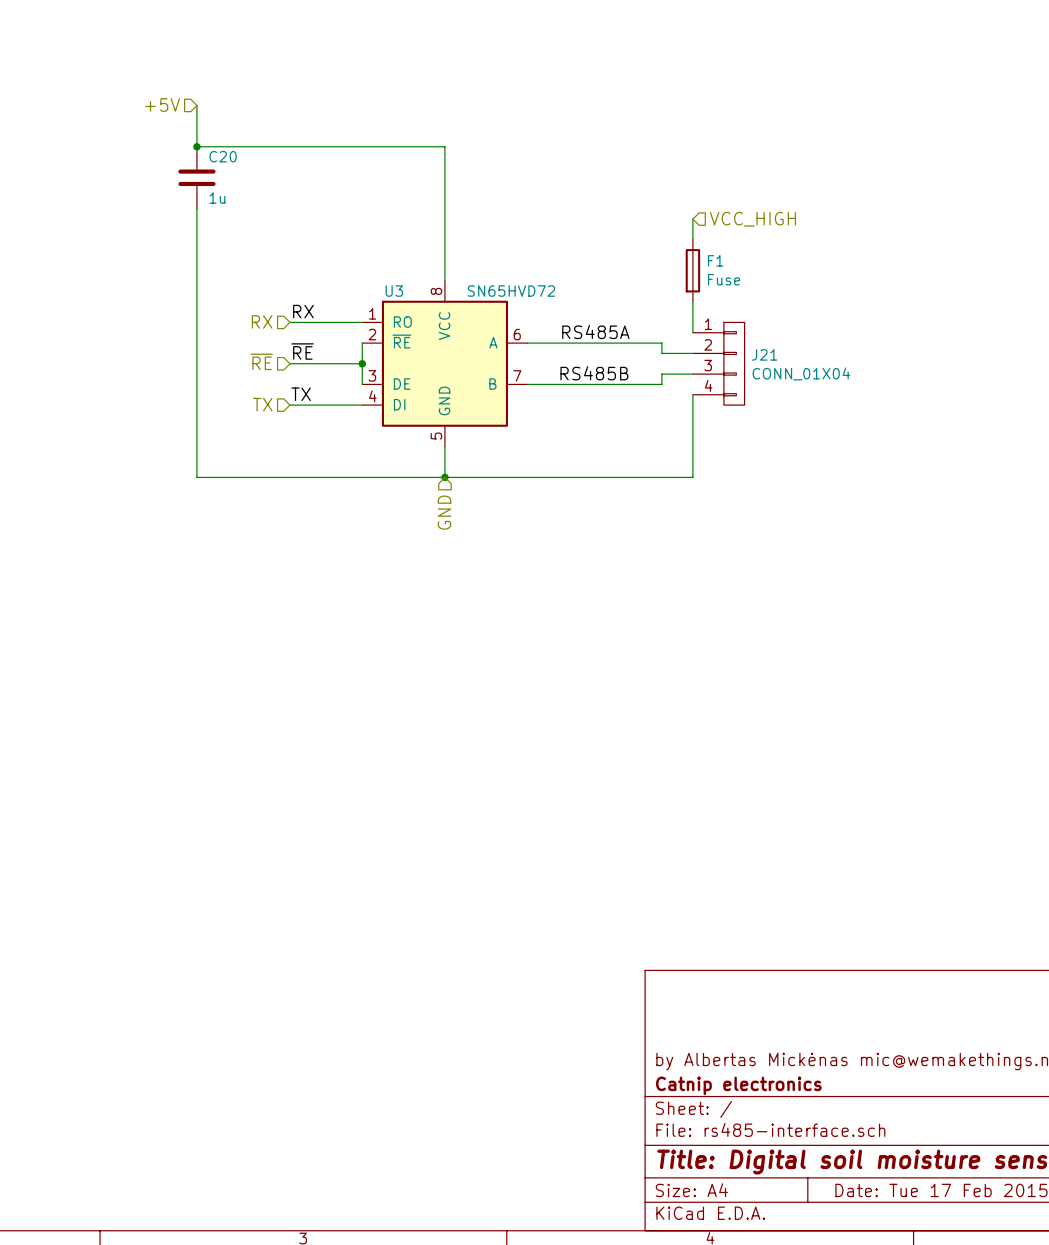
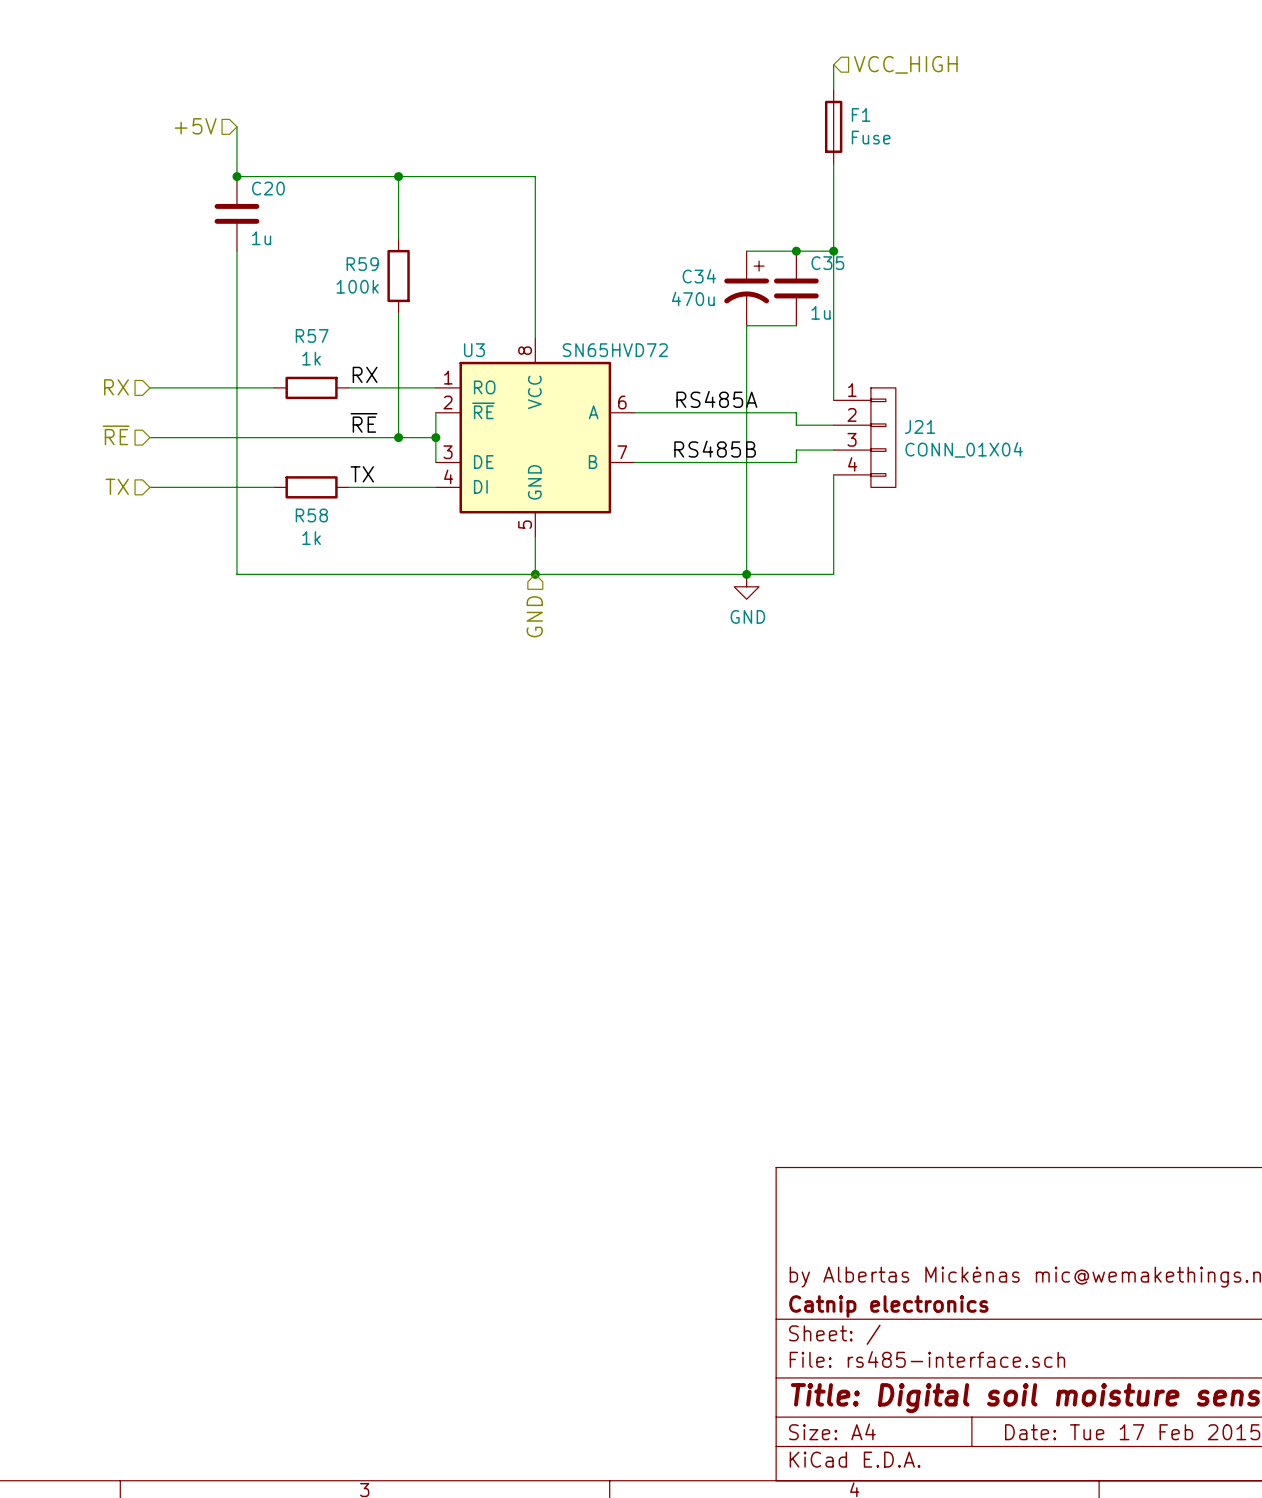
wire: none -> (833, 64) (833, 89)
wire: none -> (833, 164) (833, 263)
wire: none -> (398, 176) (398, 238)
junction: none -> (398, 176)
wire: none -> (746, 251) (833, 251)
junction: none -> (796, 251)
junction: none -> (833, 251)
hierarchical label position: VCC_HIGH (752, 219) -> VCC_HIGH (905, 64)
R59: none -> 100k (398, 276)
C34: none -> 470u (746, 288)
C35: none -> 1u (796, 288)
wire: none -> (398, 313) (398, 437)
wire: none -> (796, 325) (746, 325) (746, 574)
F1 position: (692, 270) -> (833, 126)
hierarchical label position: RX (262, 321) -> RX (116, 387)
wire: none -> (149, 387) (274, 387)
R57: none -> 1k (311, 387)
hierarchical label position: ~{RE} (261, 361) -> ~{RE} (116, 435)
wire: none -> (149, 437) (348, 437)
junction: none -> (398, 437)
hierarchical label position: TX (262, 404) -> TX (117, 486)
wire: none -> (149, 487) (274, 487)
R58: none -> 1k (311, 487)
junction: none -> (746, 574)
power symbol: none -> GND (746, 586)

